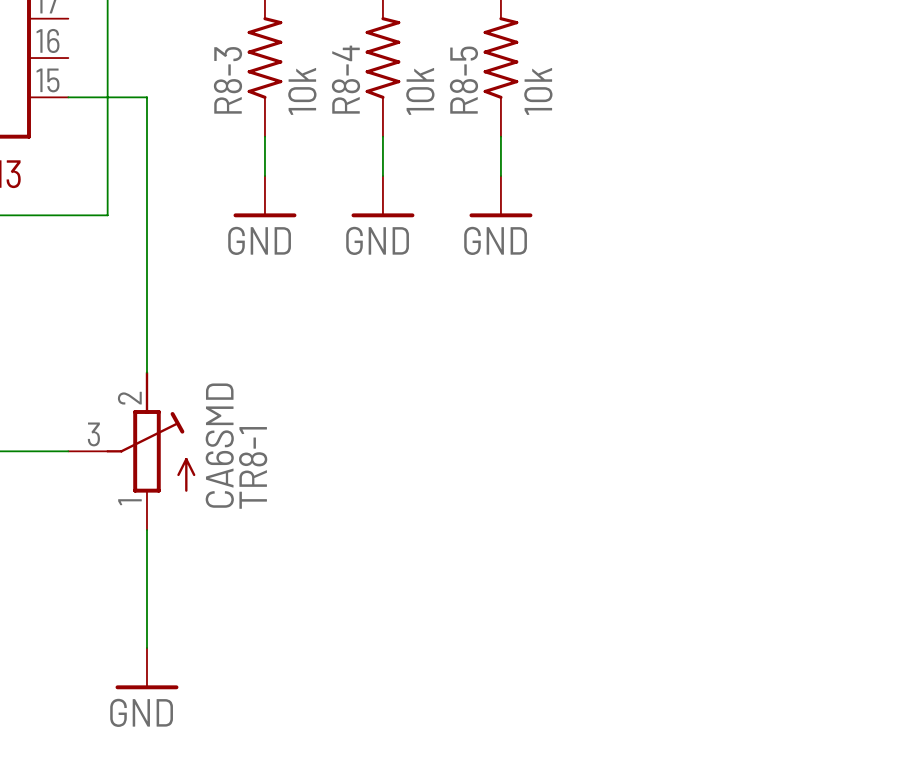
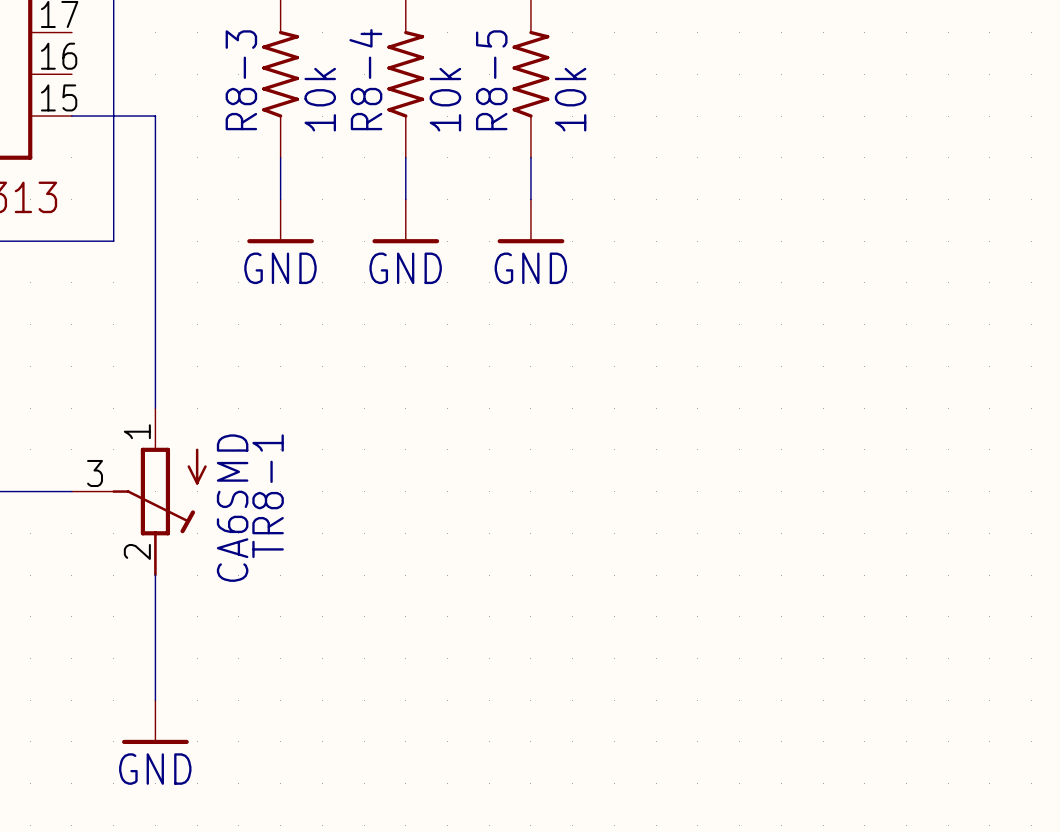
TR8-1 flip: as is (150, 432) -> up-down (159, 512)

